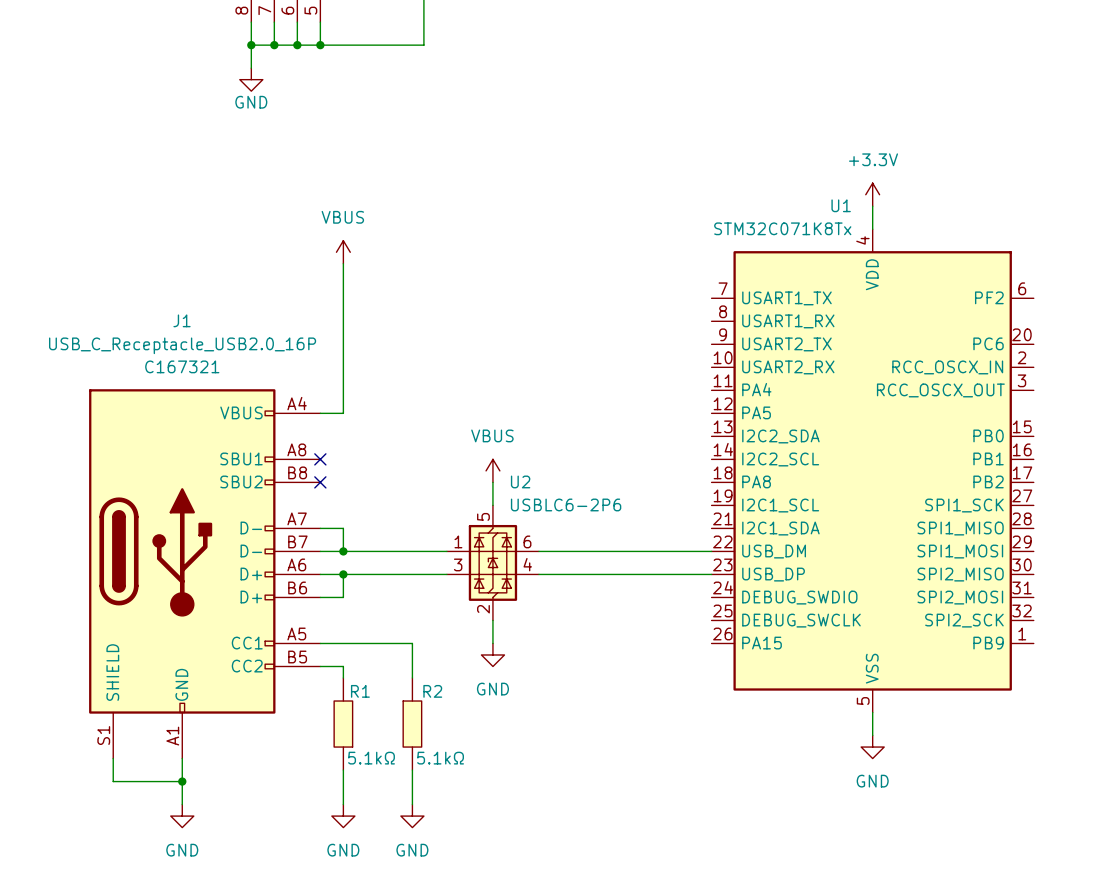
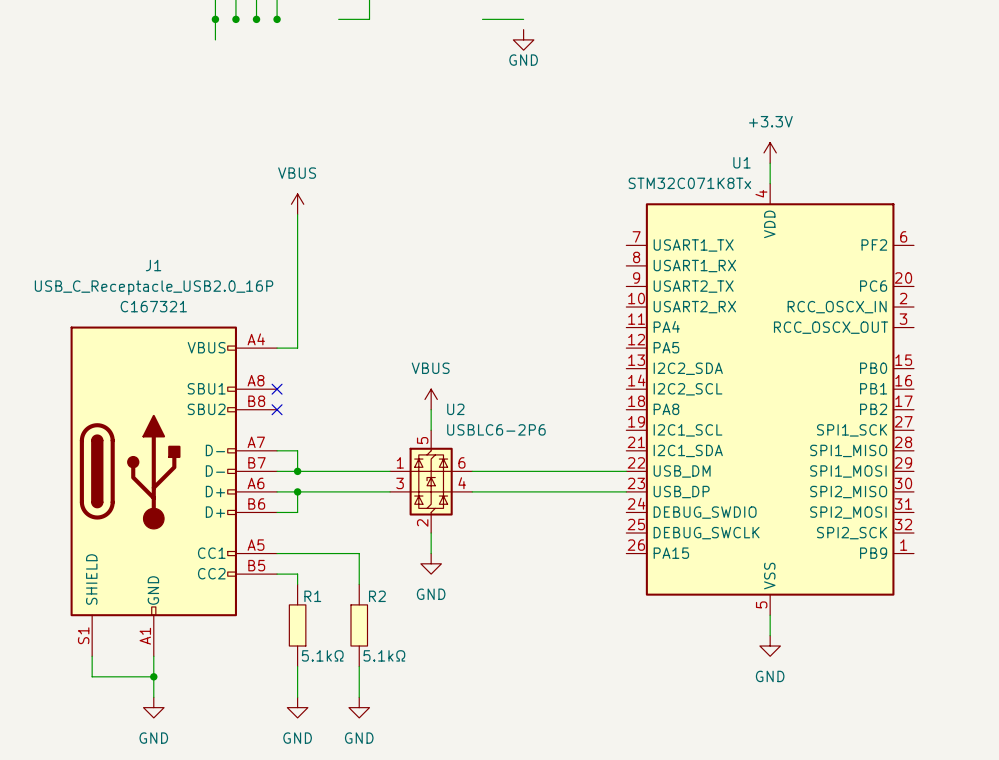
wire: (251, 45) (389, 45) -> none
wire: none -> (482, 19) (523, 19)
power symbol: none -> GND (523, 39)
power symbol: GND (251, 79) -> none

